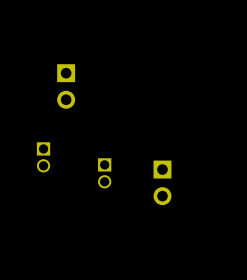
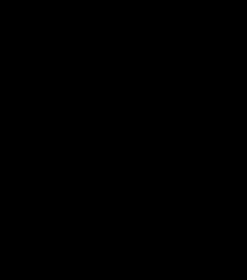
part: (66, 86) -> none
part: (43, 157) -> none
part: (104, 173) -> none
part: (162, 182) -> none

